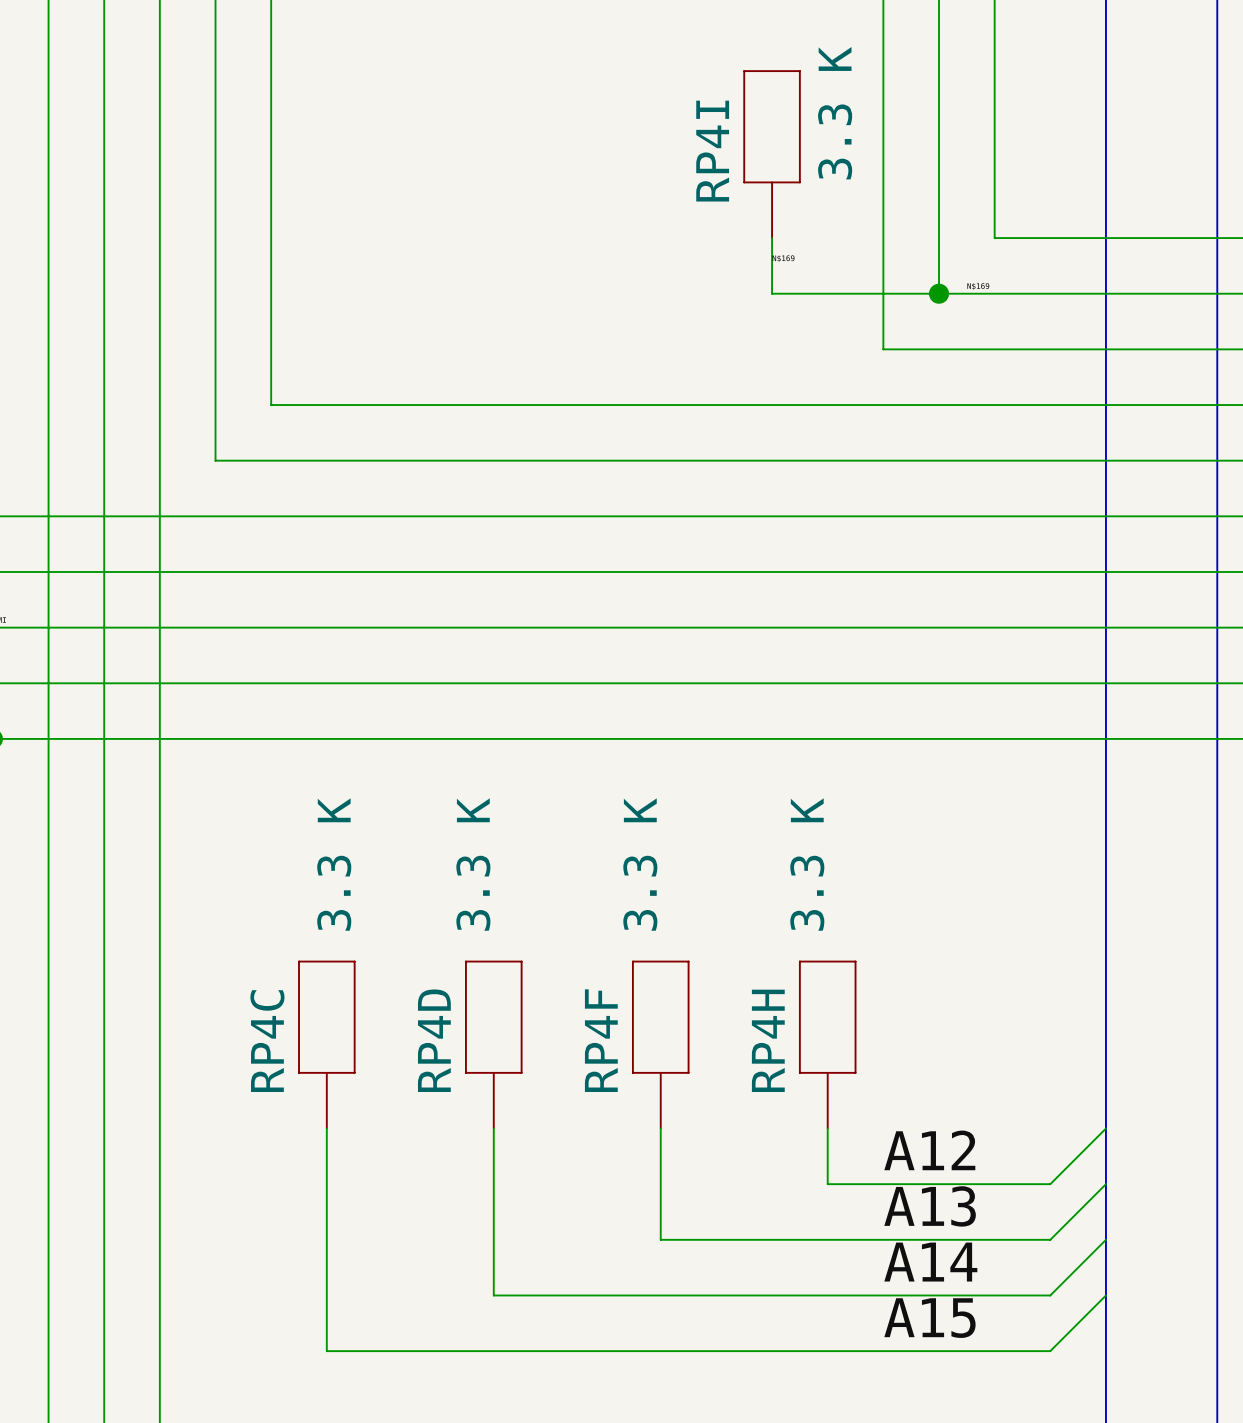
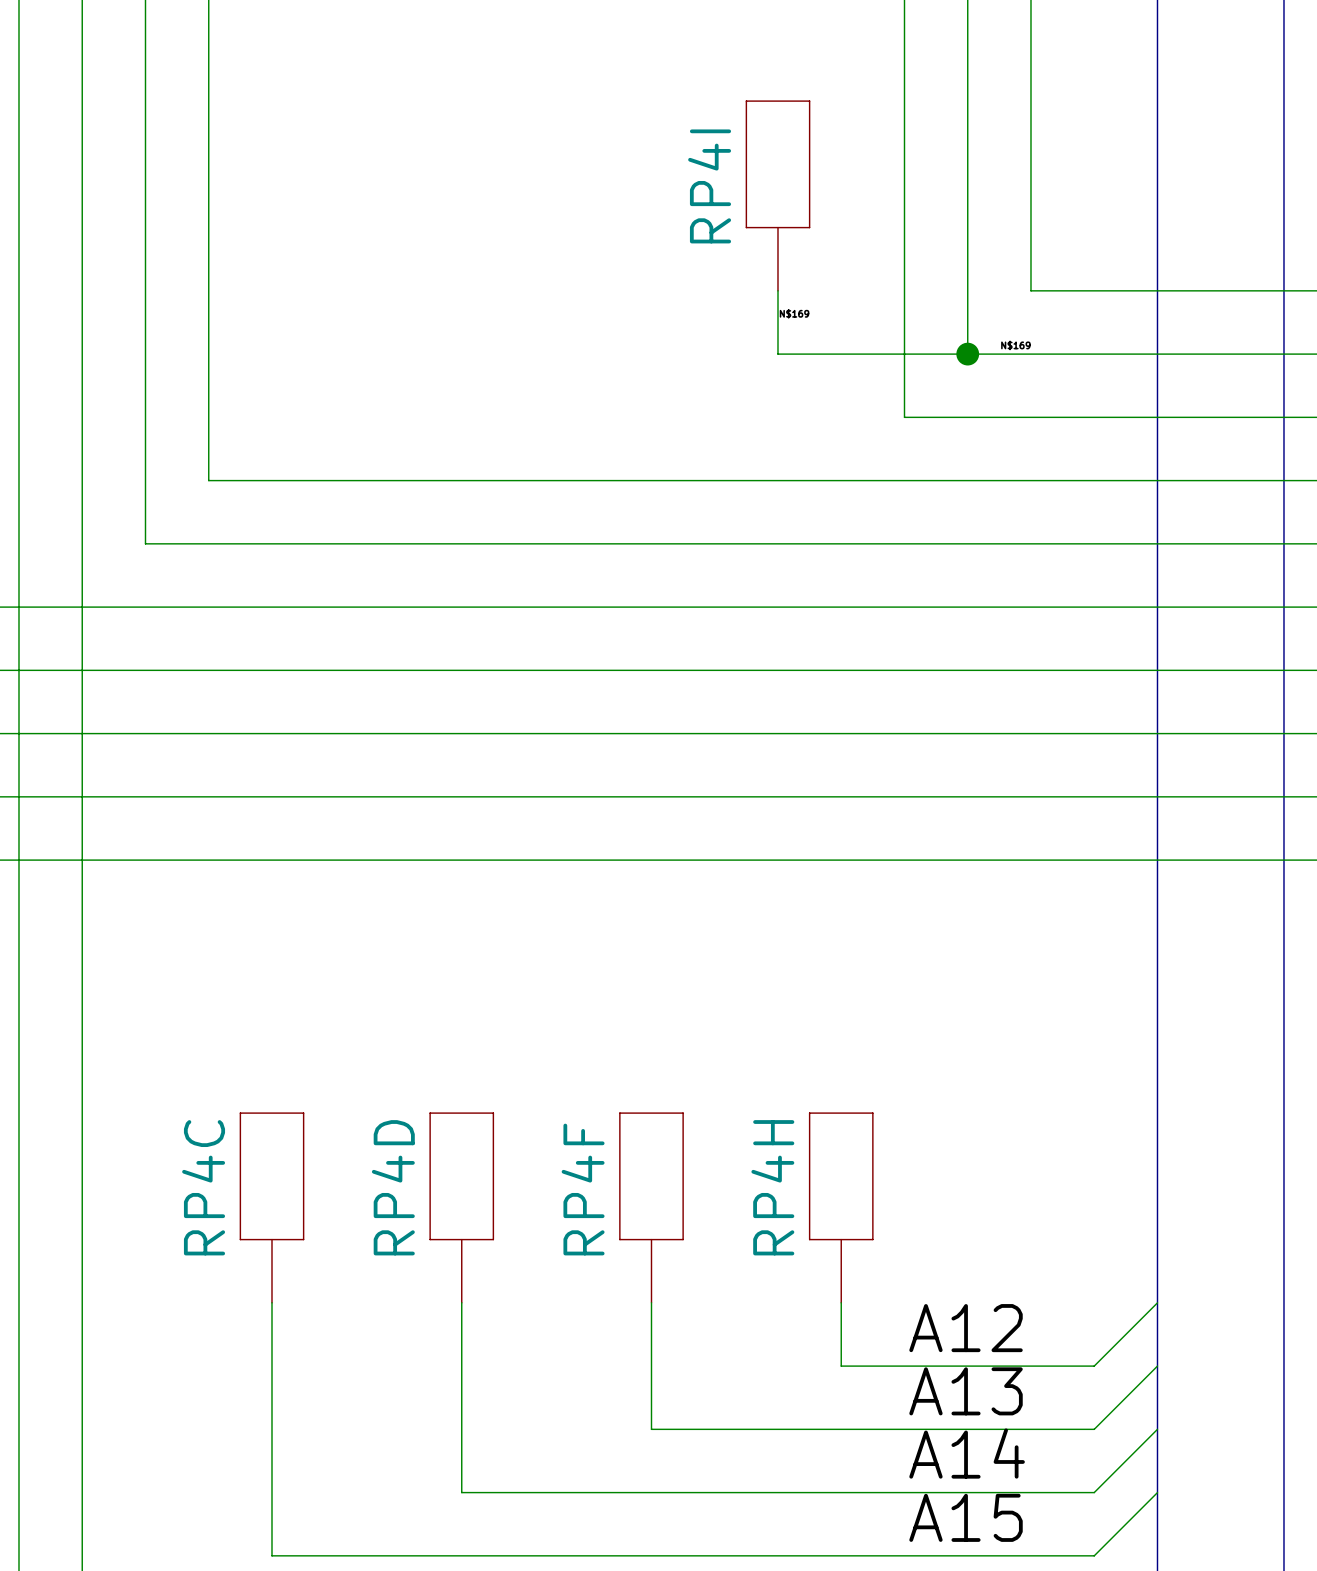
RP4I value: 3.3 K (835, 113) -> none
RP4C value: 3.3 K (334, 864) -> none
RP4D value: 3.3 K (473, 864) -> none
RP4F value: 3.3 K (640, 864) -> none
RP4H value: 3.3 K (807, 864) -> none

